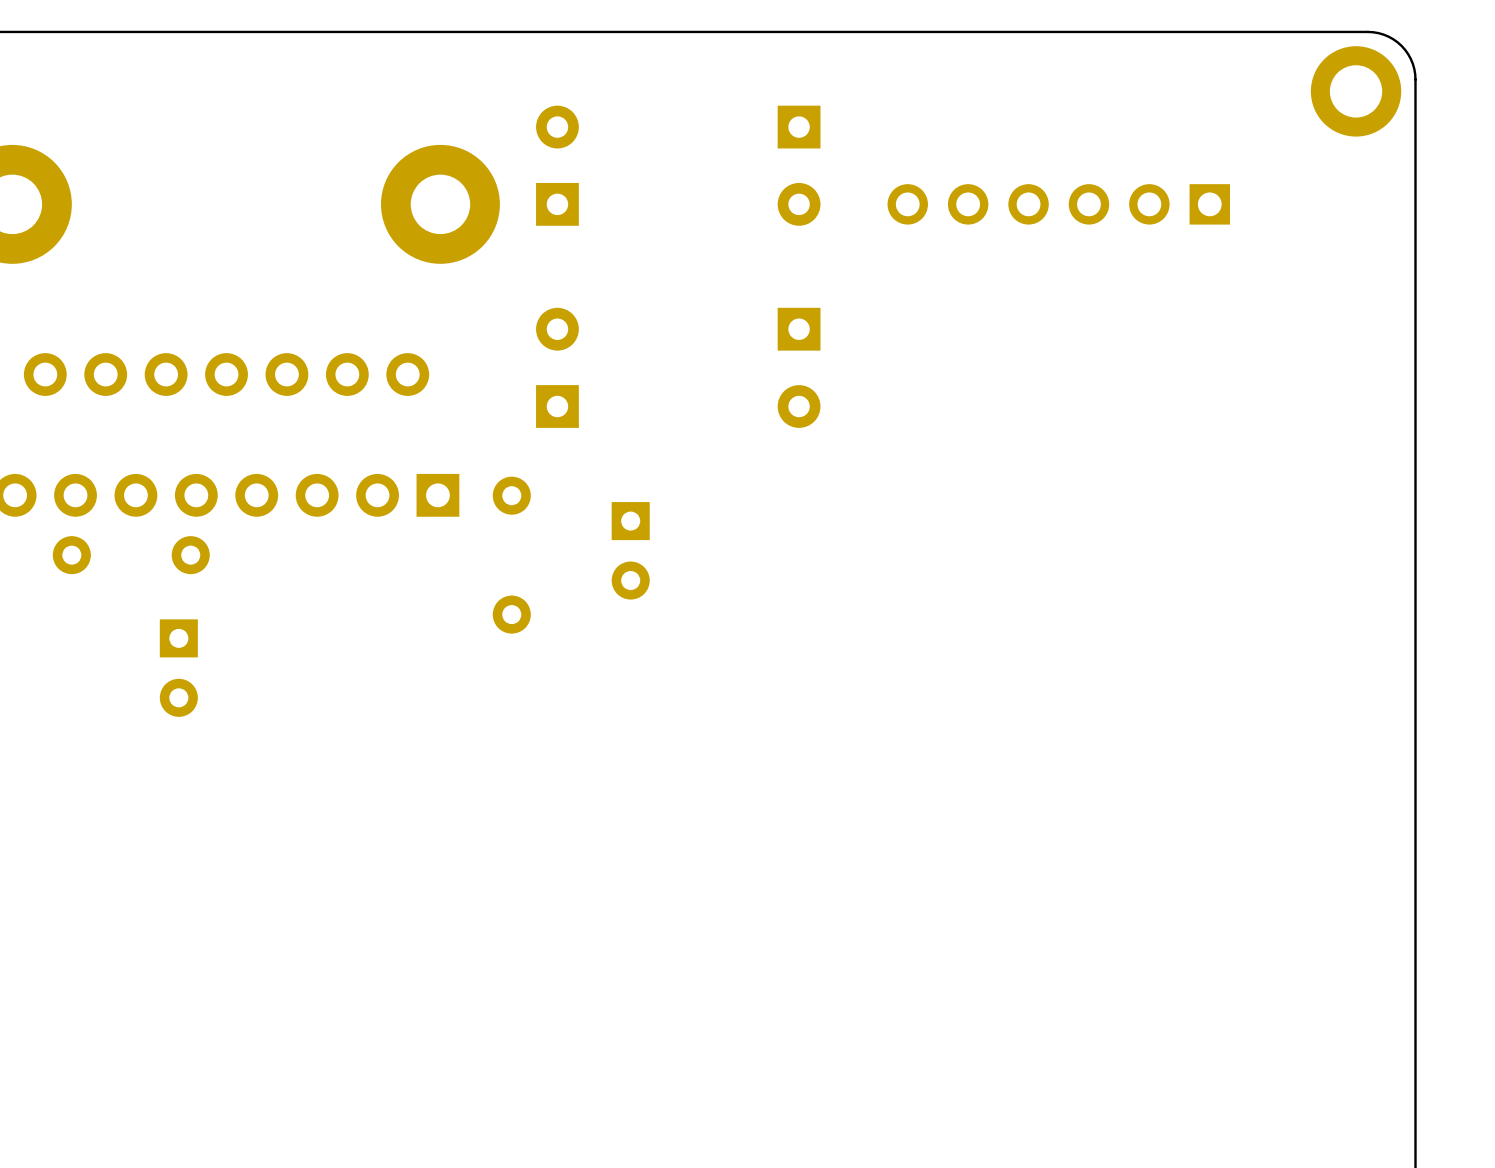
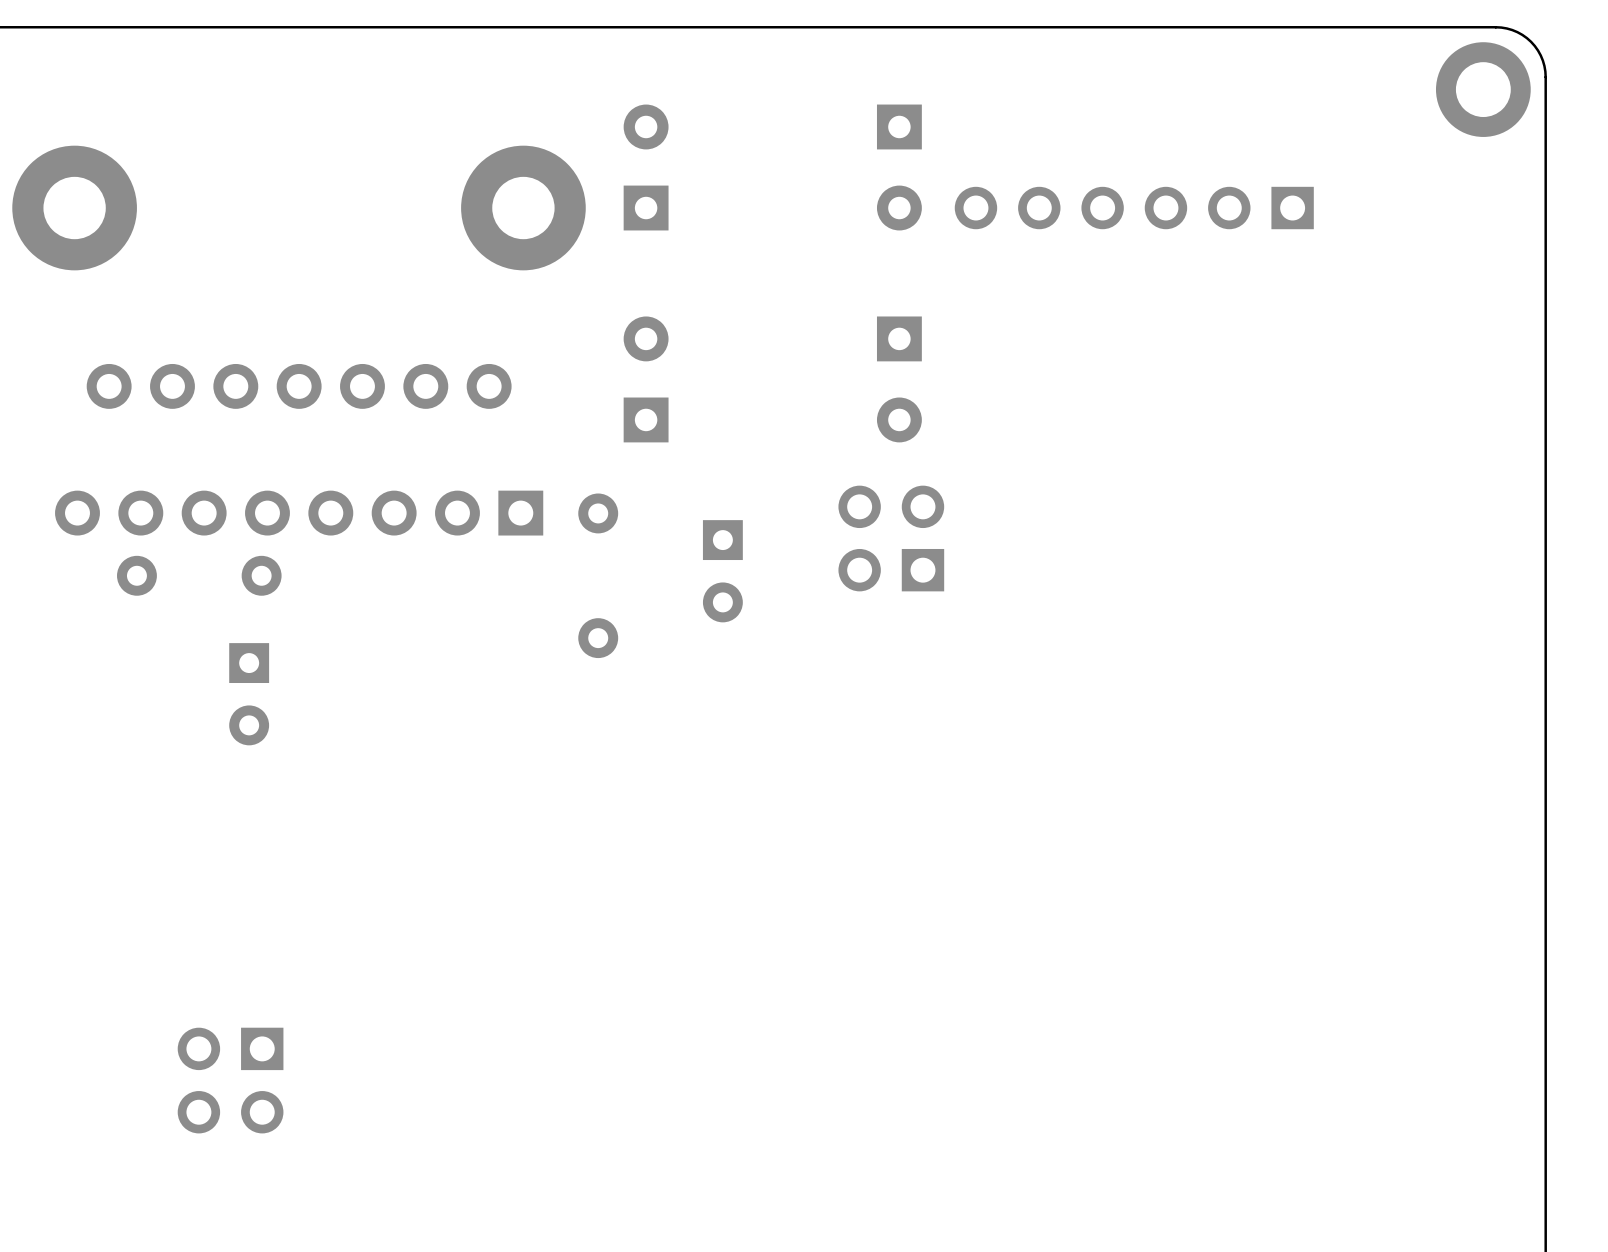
part position: (1058, 204) -> (1134, 208)
part: none -> (891, 538)
part: none -> (230, 1080)

